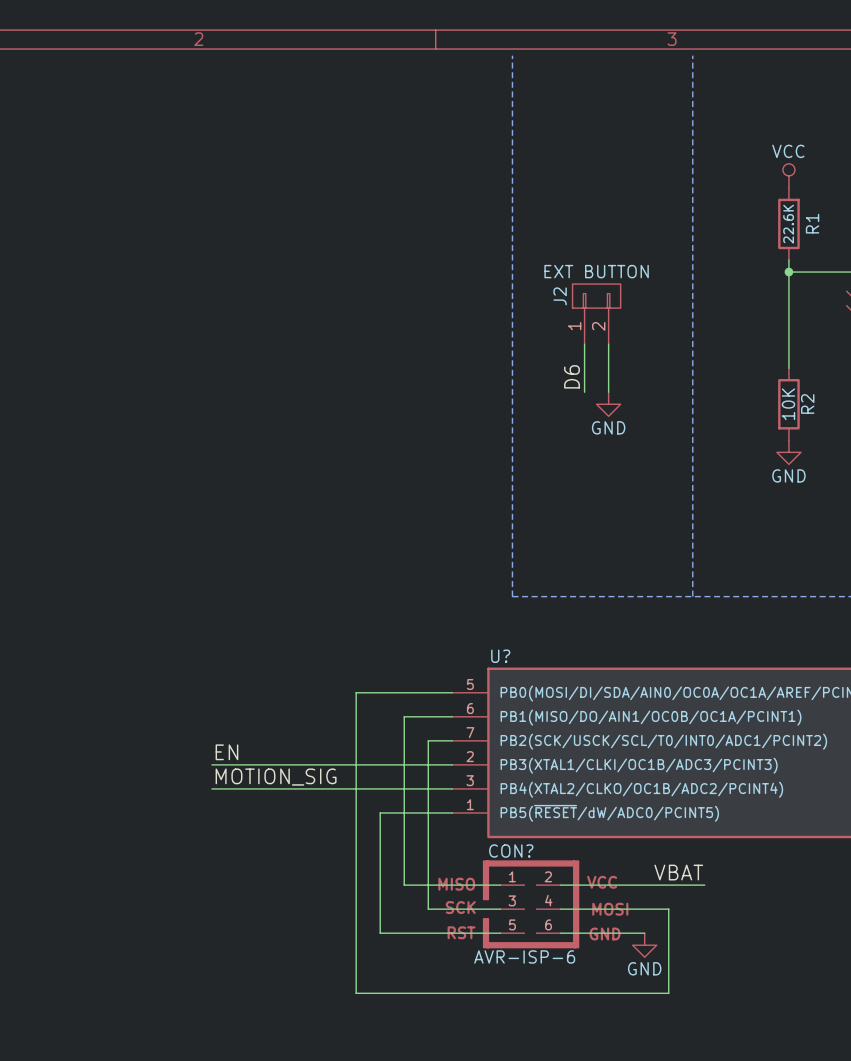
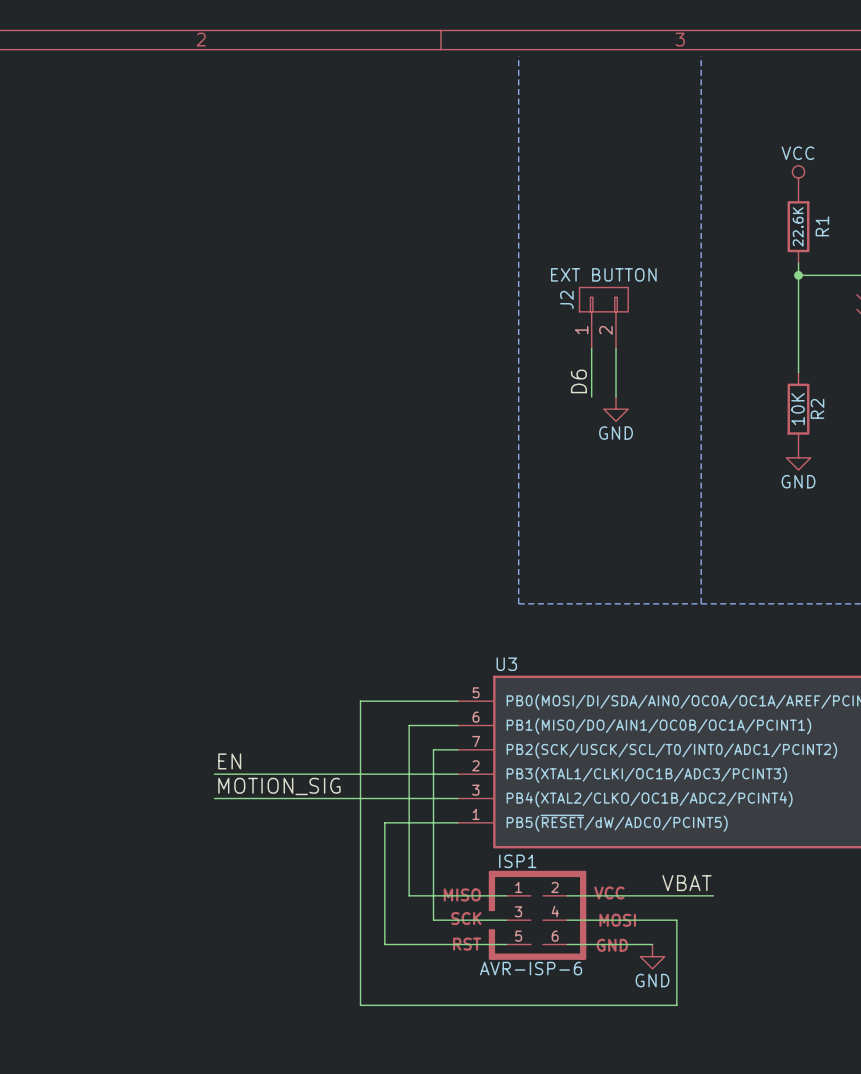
U? name: U? (500, 656) -> U3 (506, 664)
CON? name: CON? (511, 851) -> ISP1 (517, 861)

